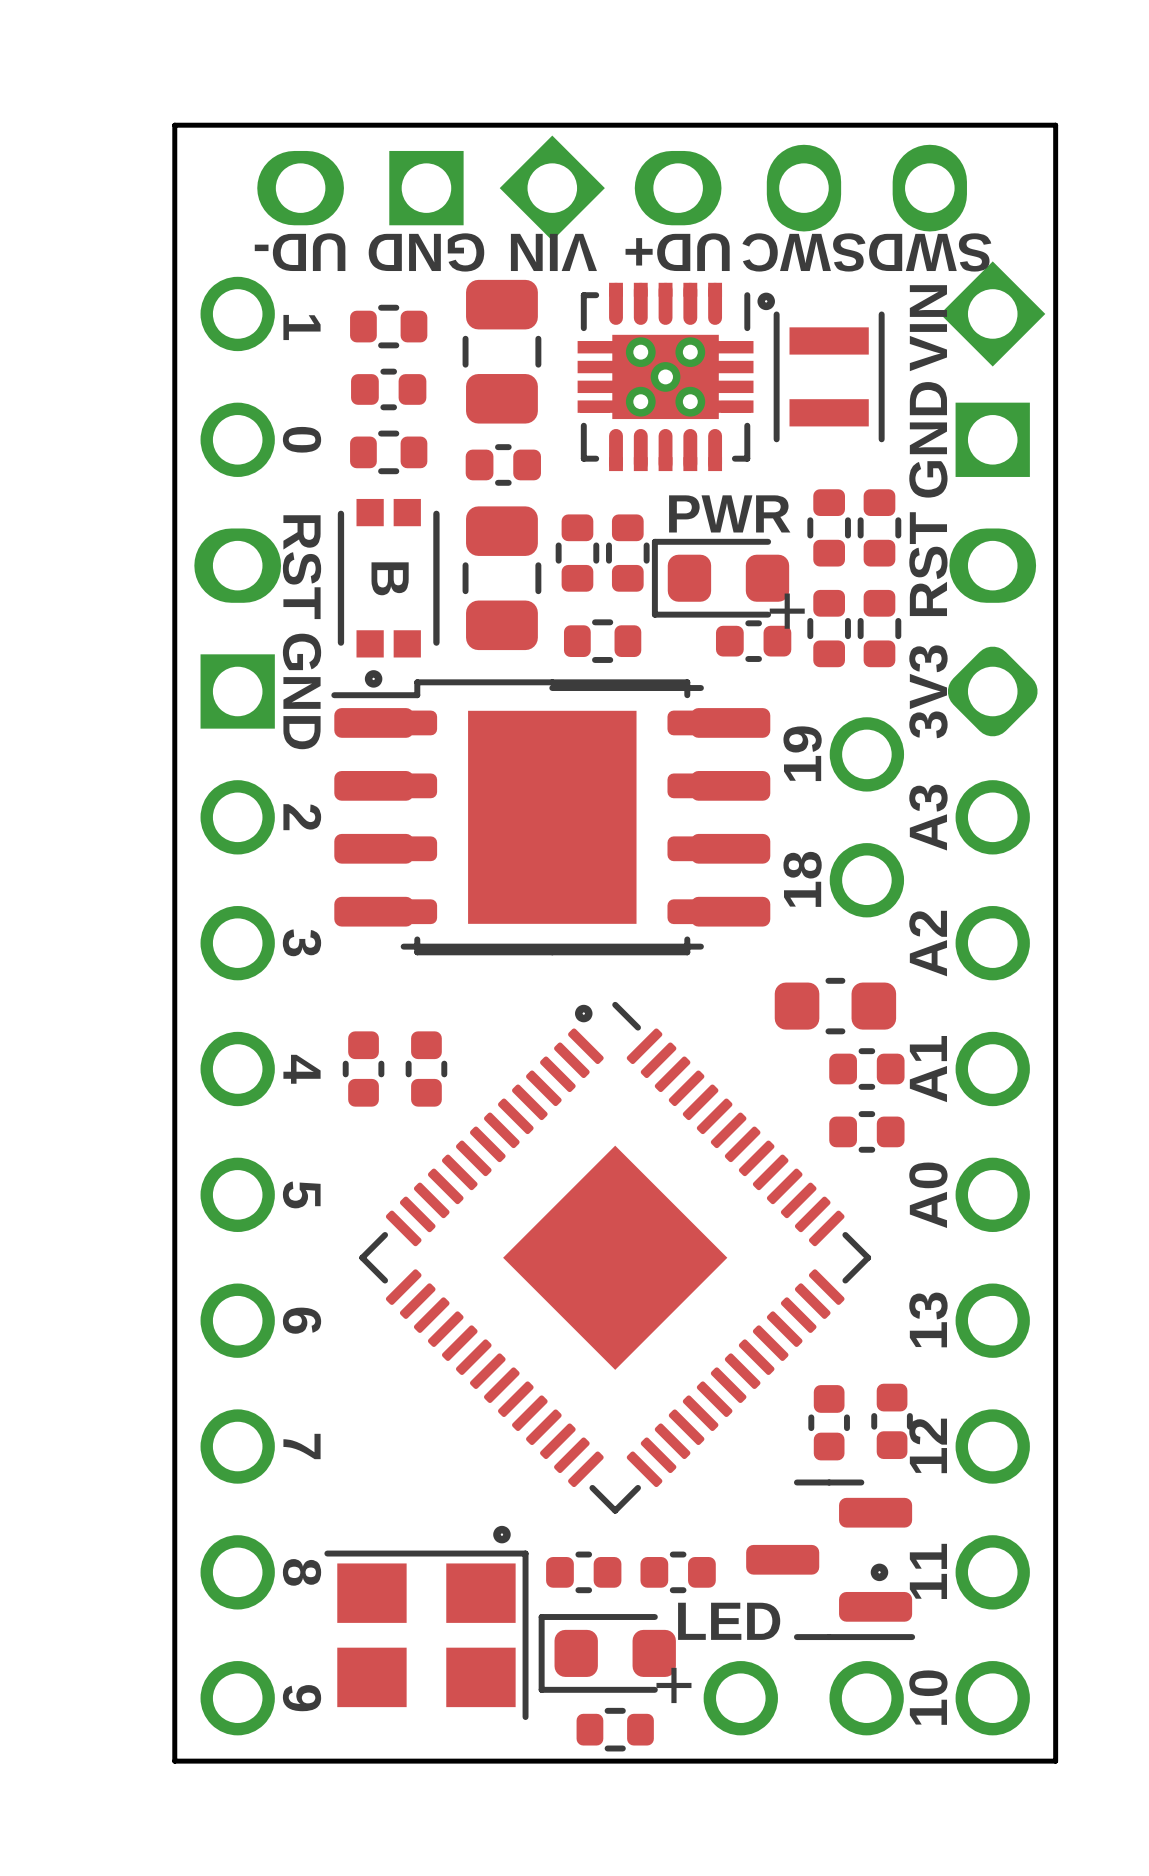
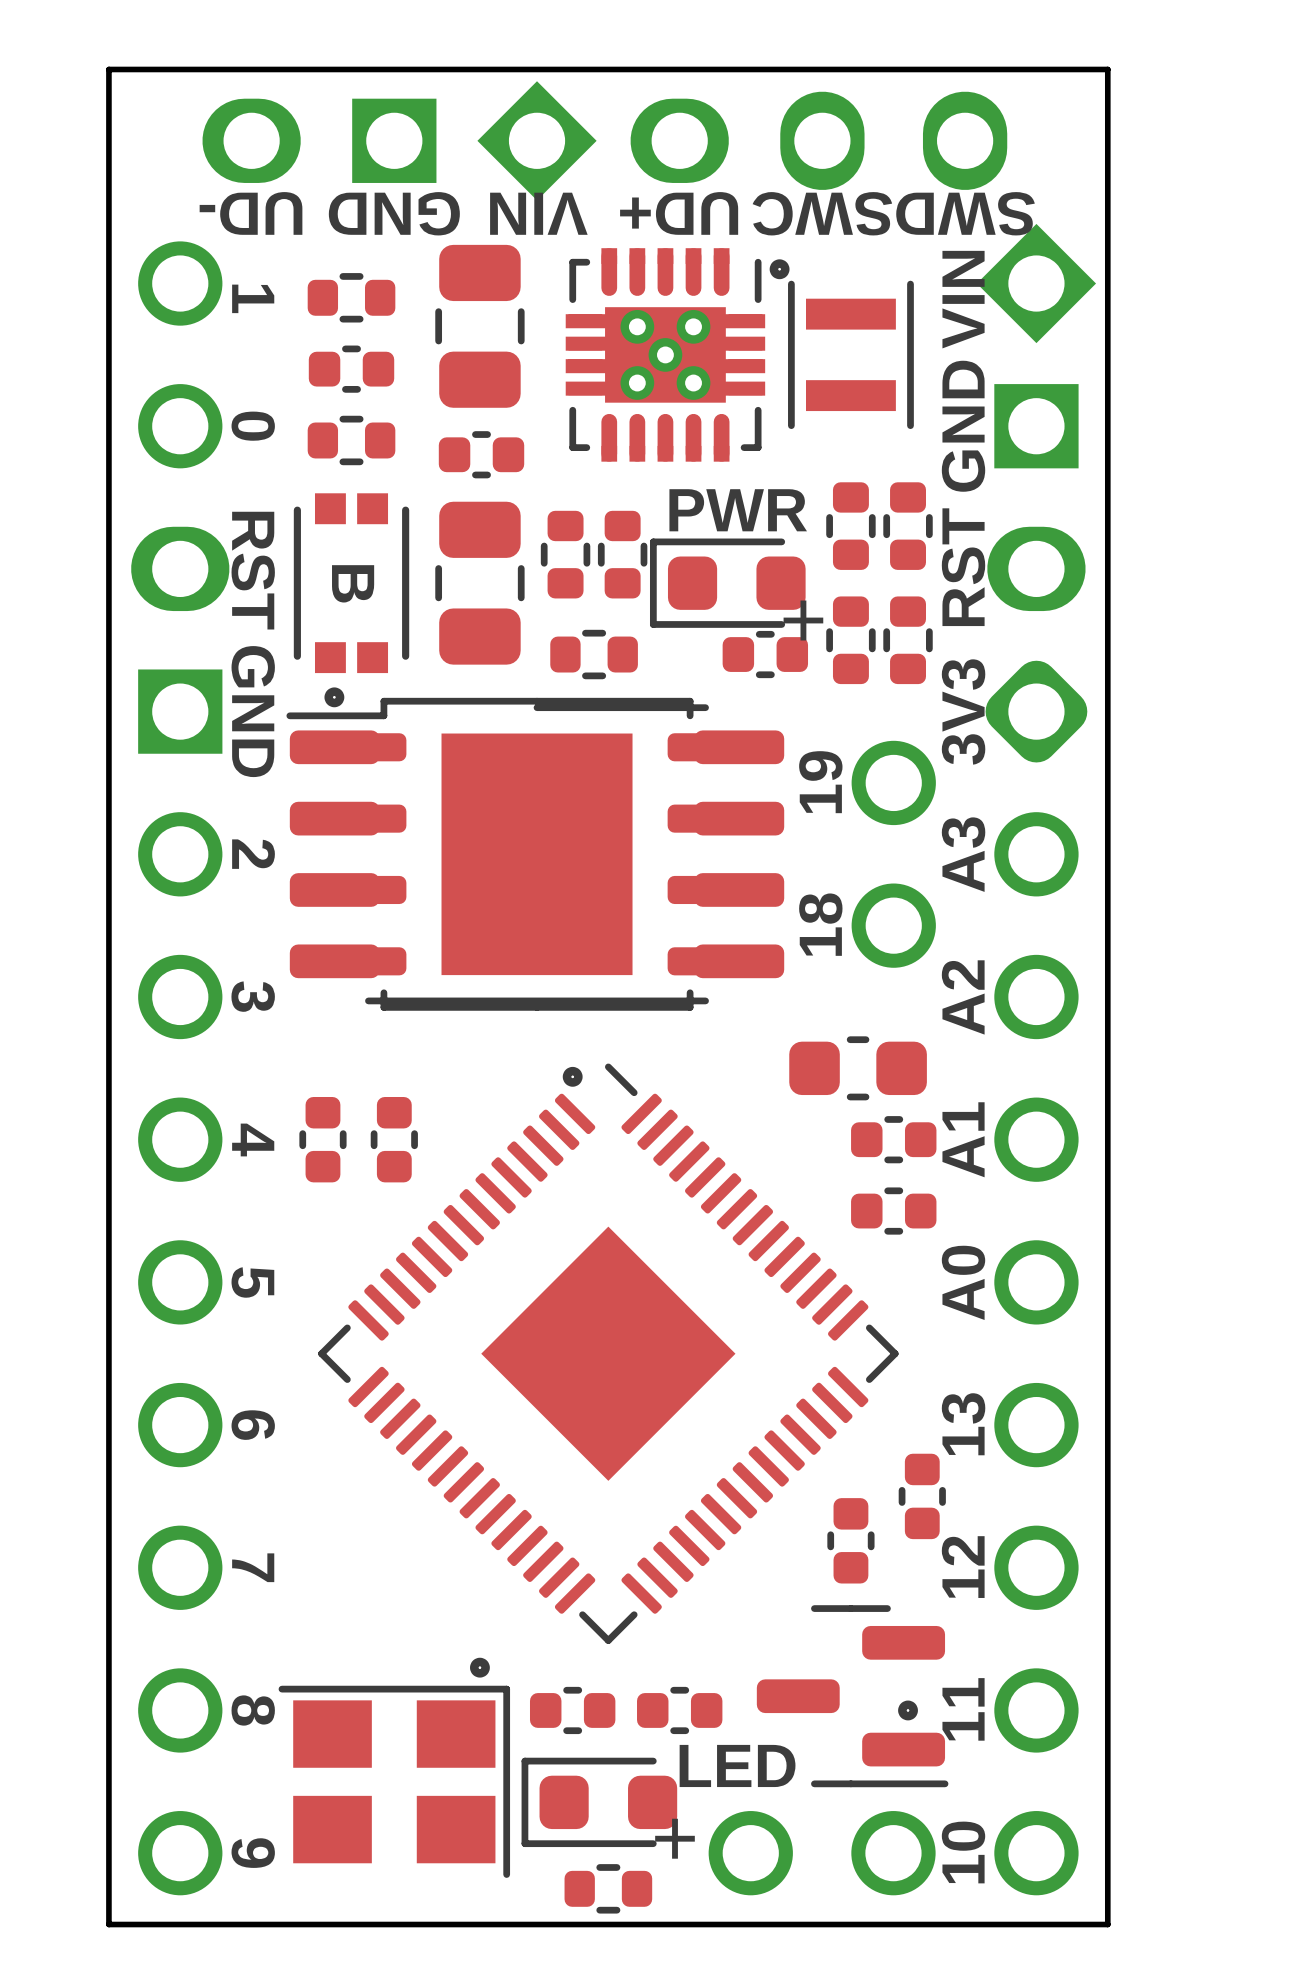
part position: (892, 1421) -> (922, 1496)

